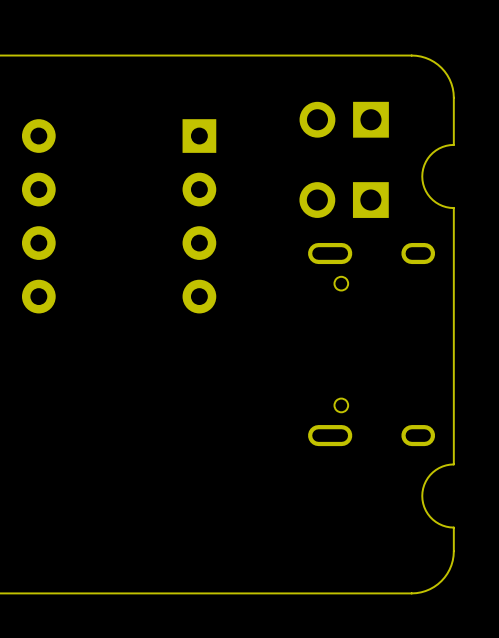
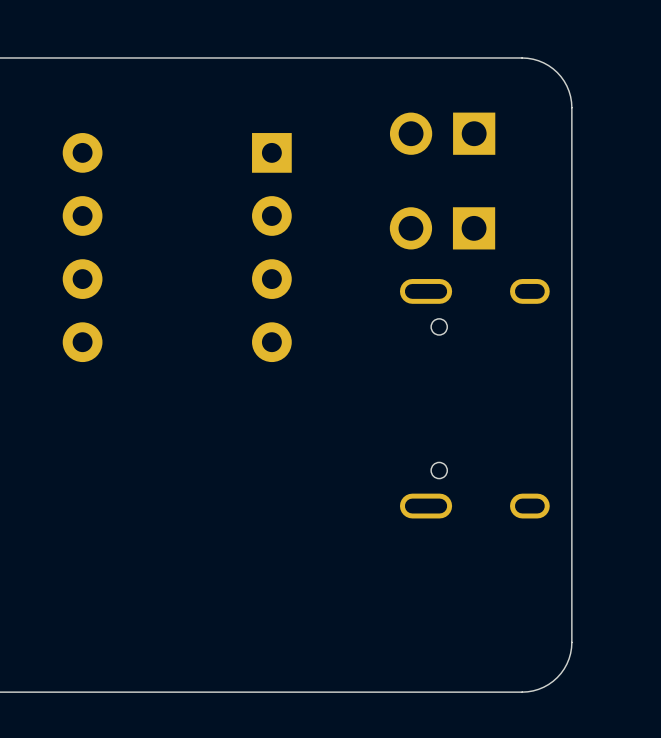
board edge: (453, 144) (439, 148) (430, 155) (424, 165) (422, 176) (424, 187) (430, 197) (439, 204) (453, 208) -> (571, 163) (571, 237)
board edge: (453, 464) (442, 466) (430, 475) (424, 484) (422, 496) (424, 507) (430, 516) (442, 525) (453, 527) -> (571, 540) (571, 614)

